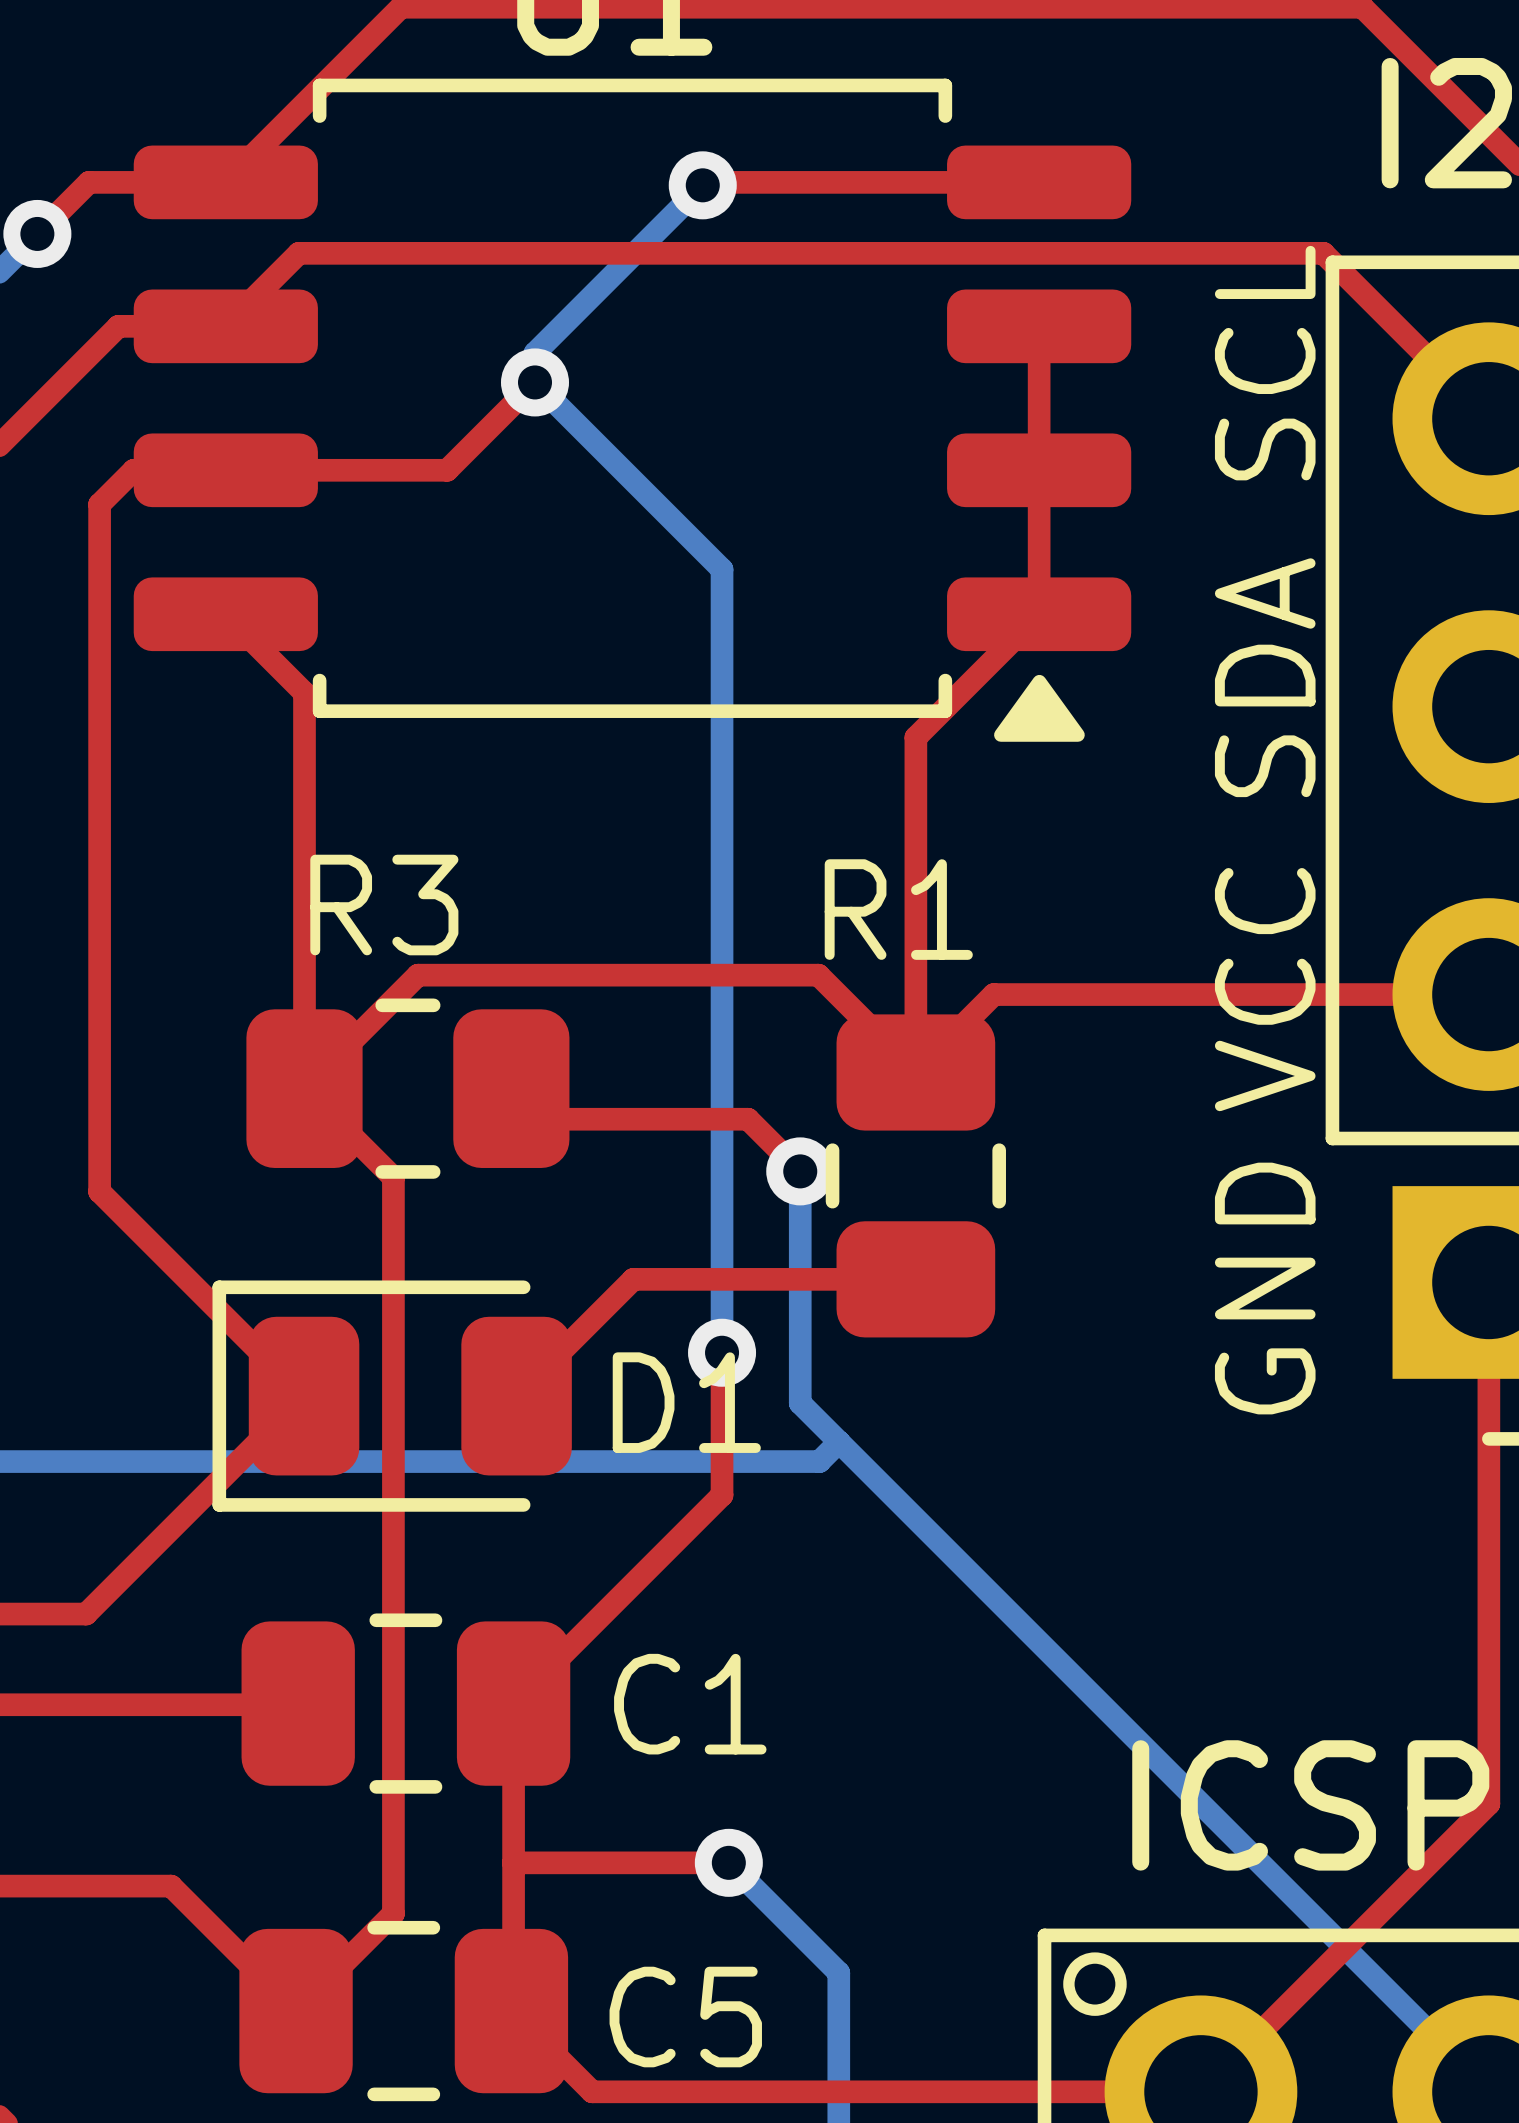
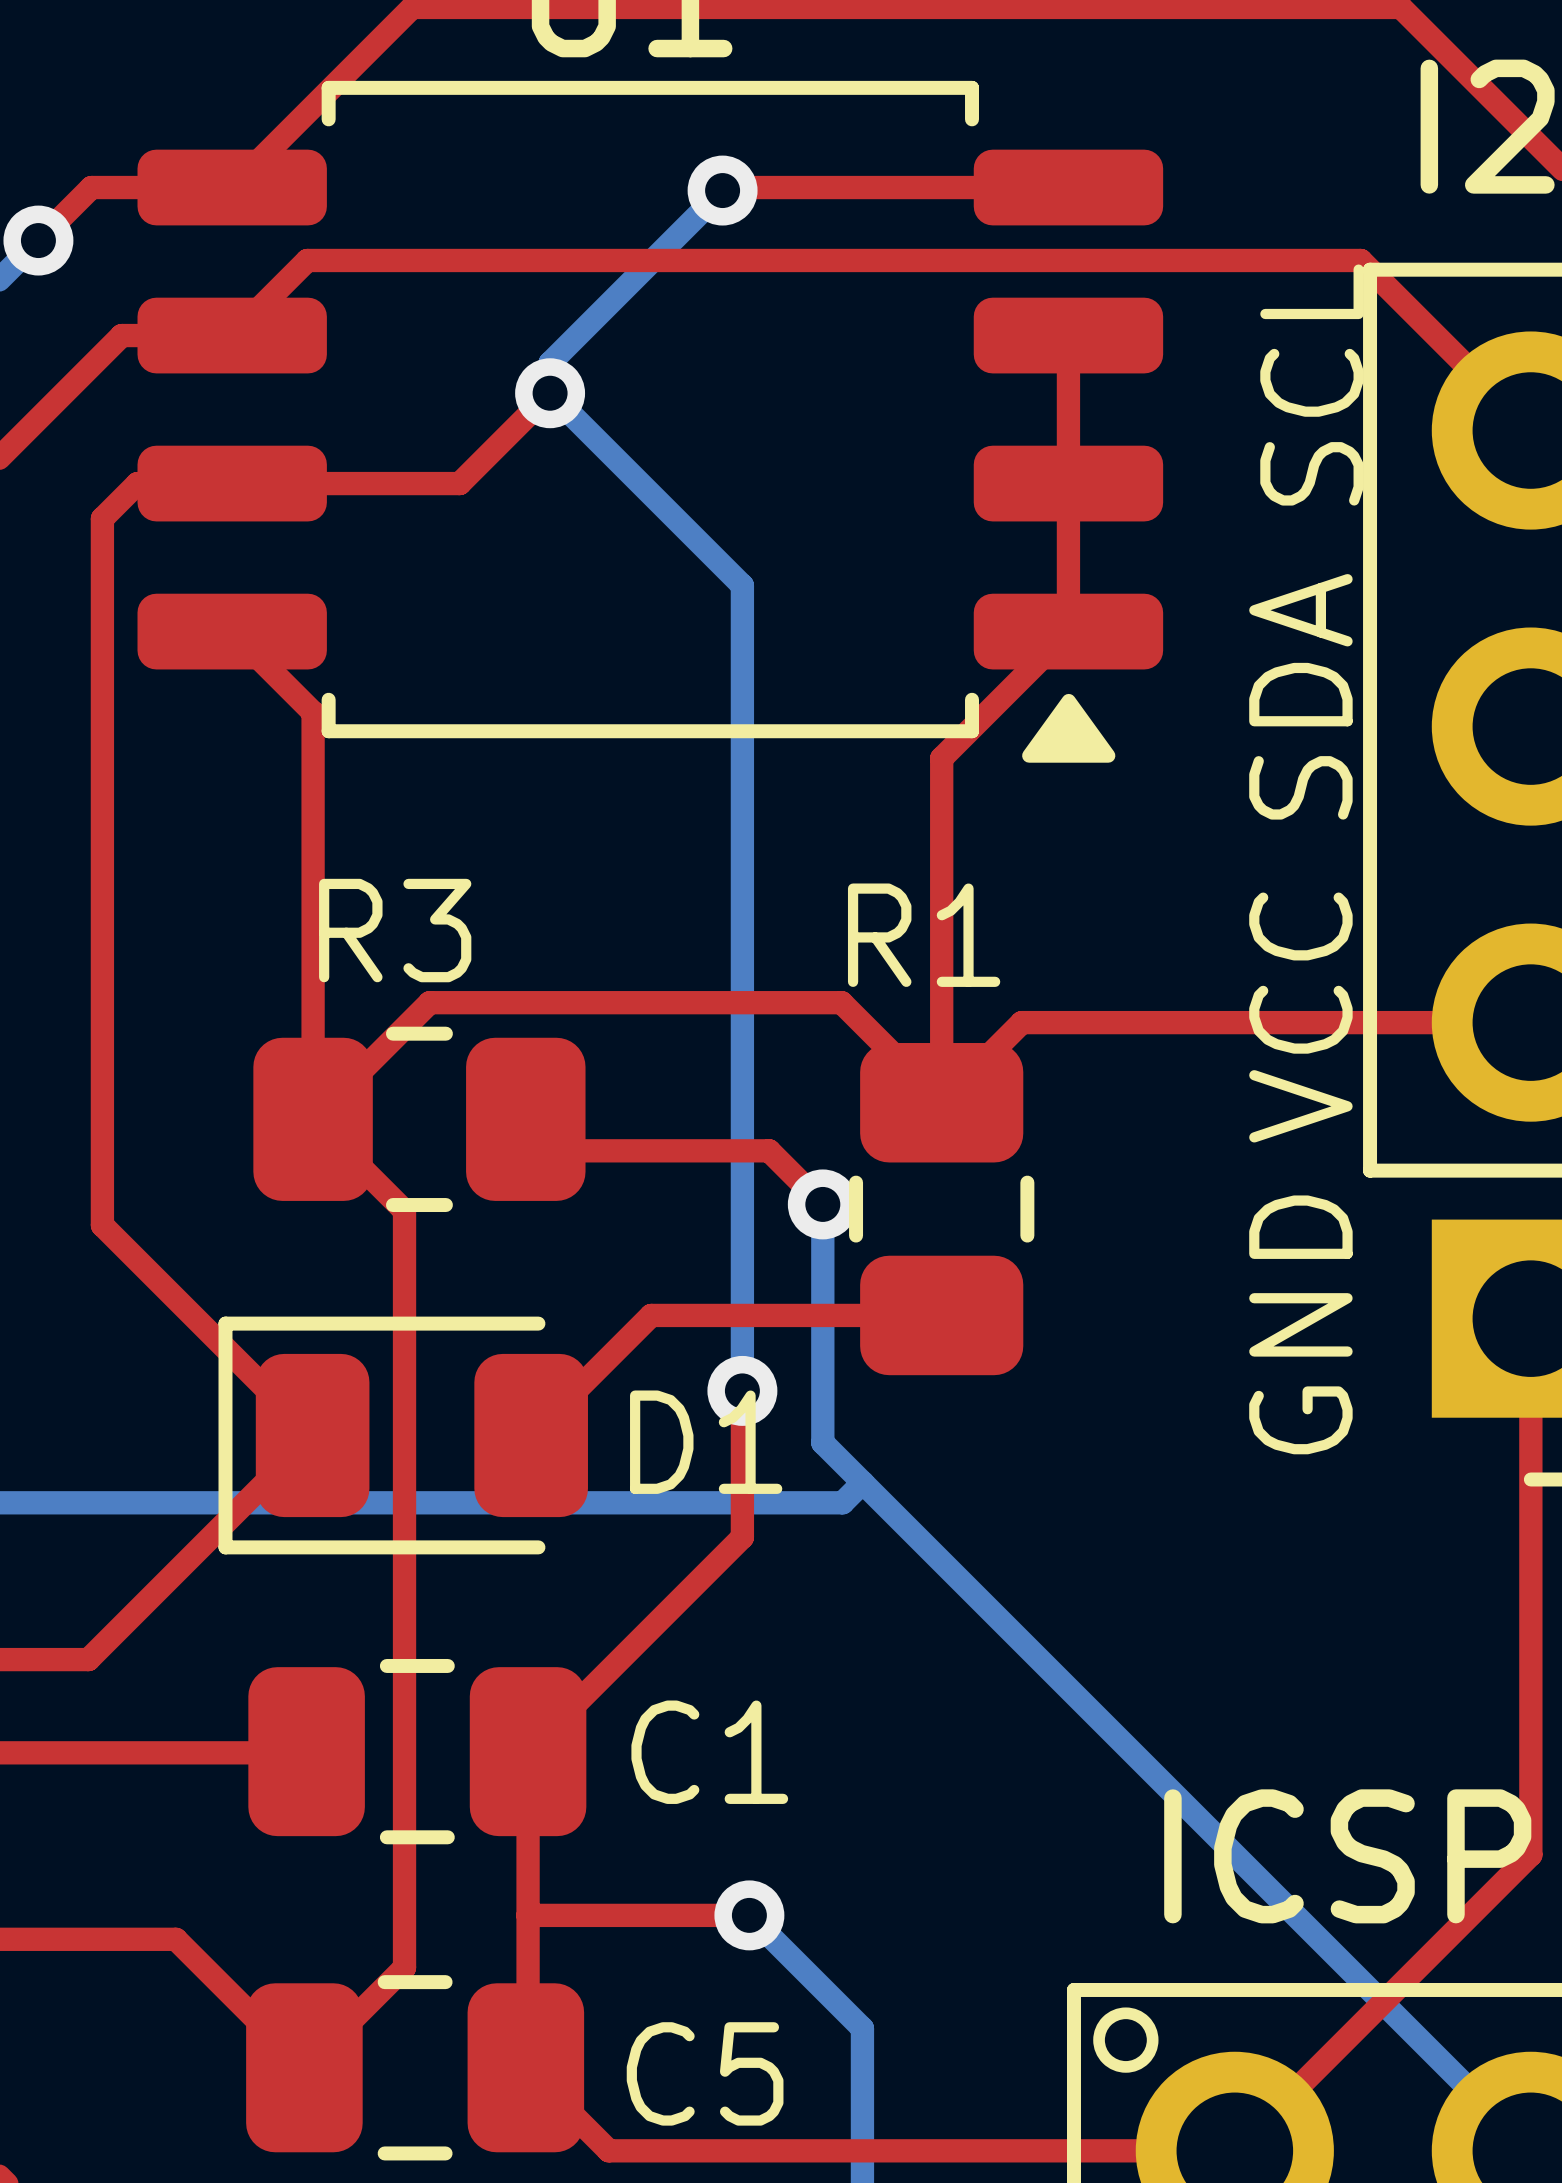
text position: SCL (1265, 363) -> SCL (1312, 385)

